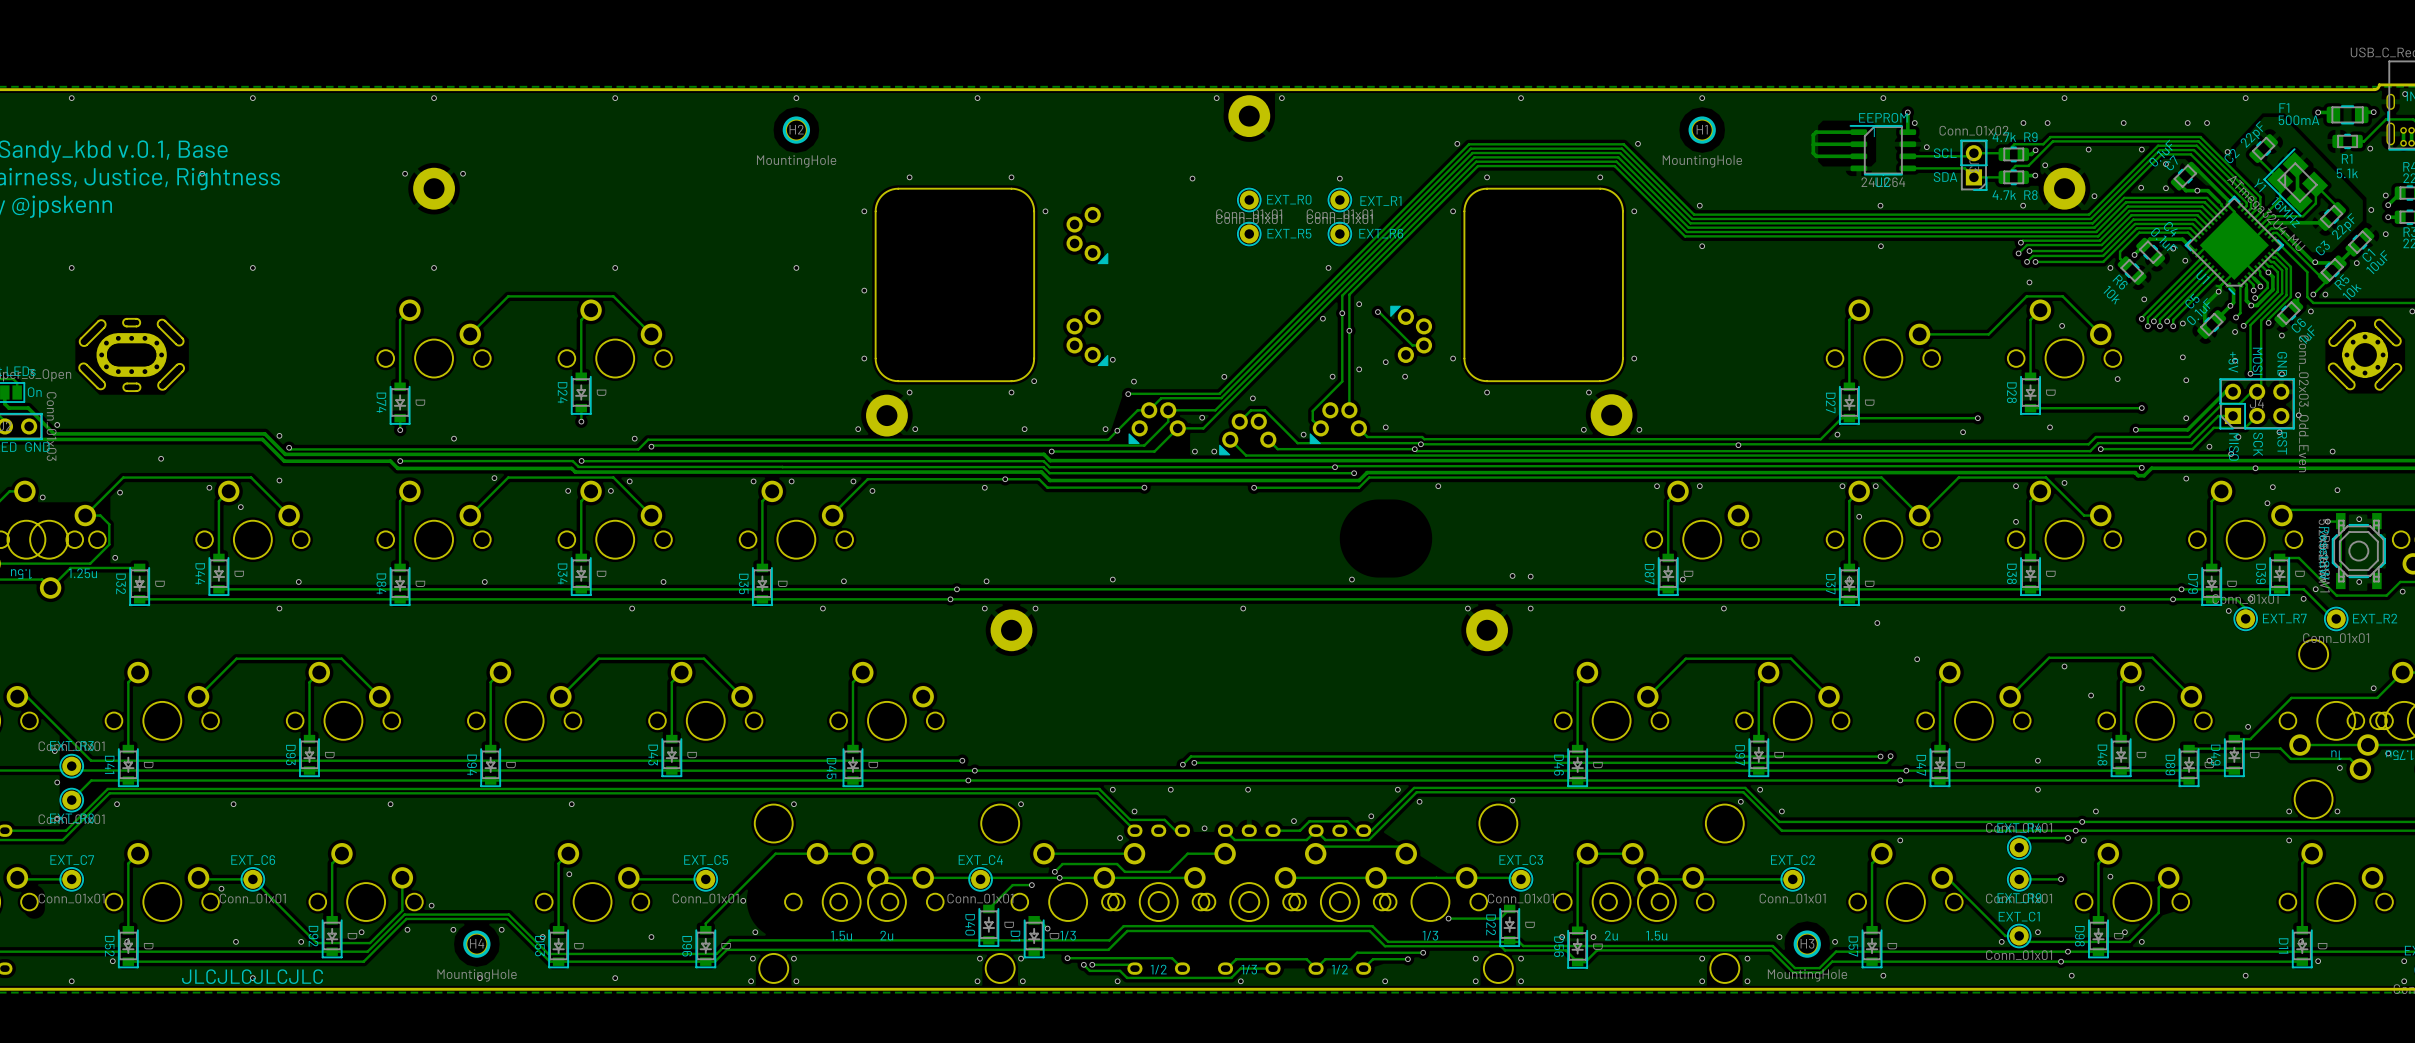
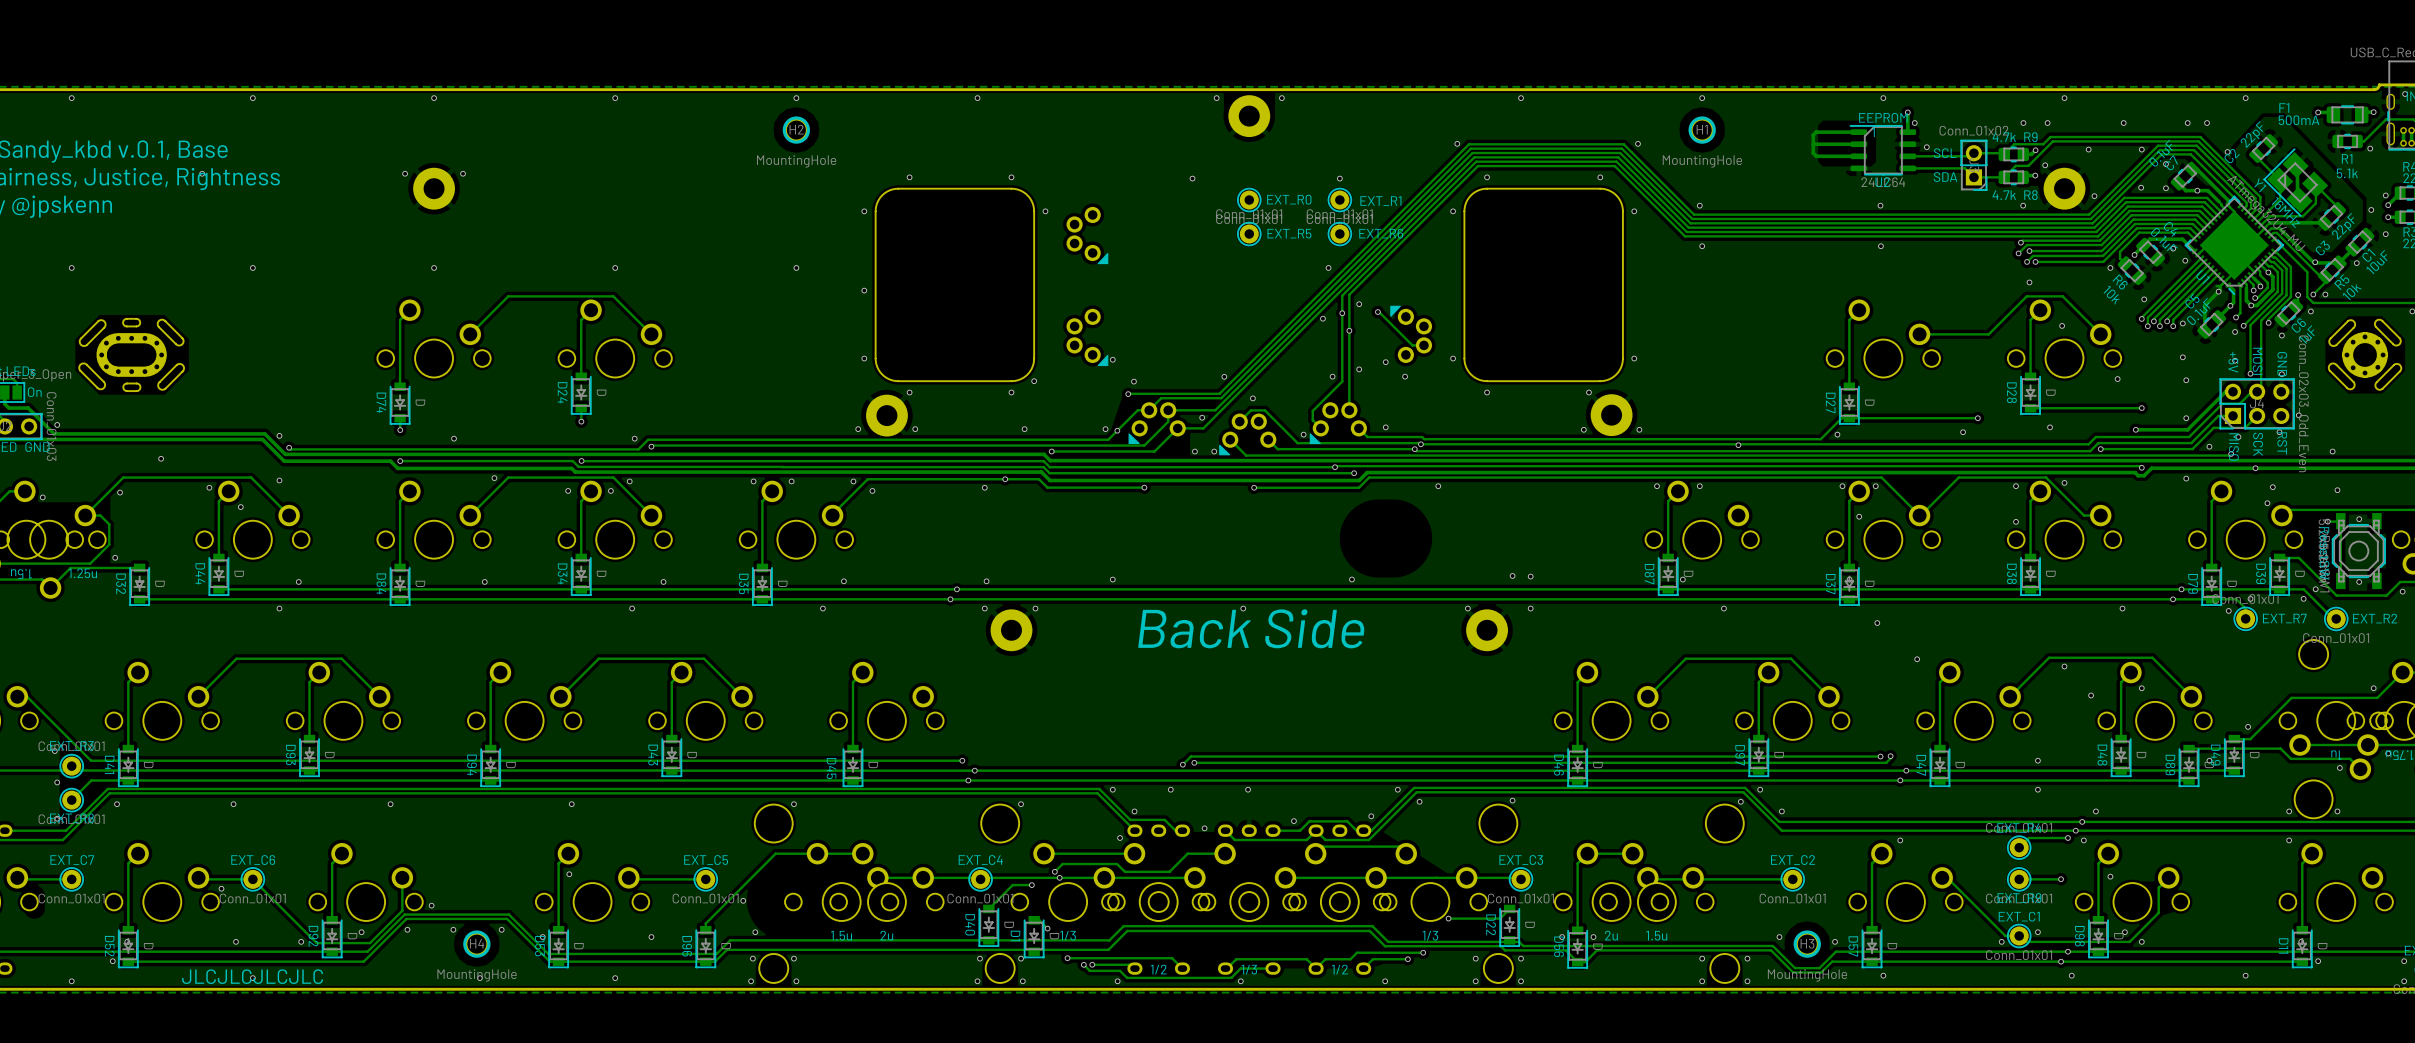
text: none -> Back Side (1251, 628)

